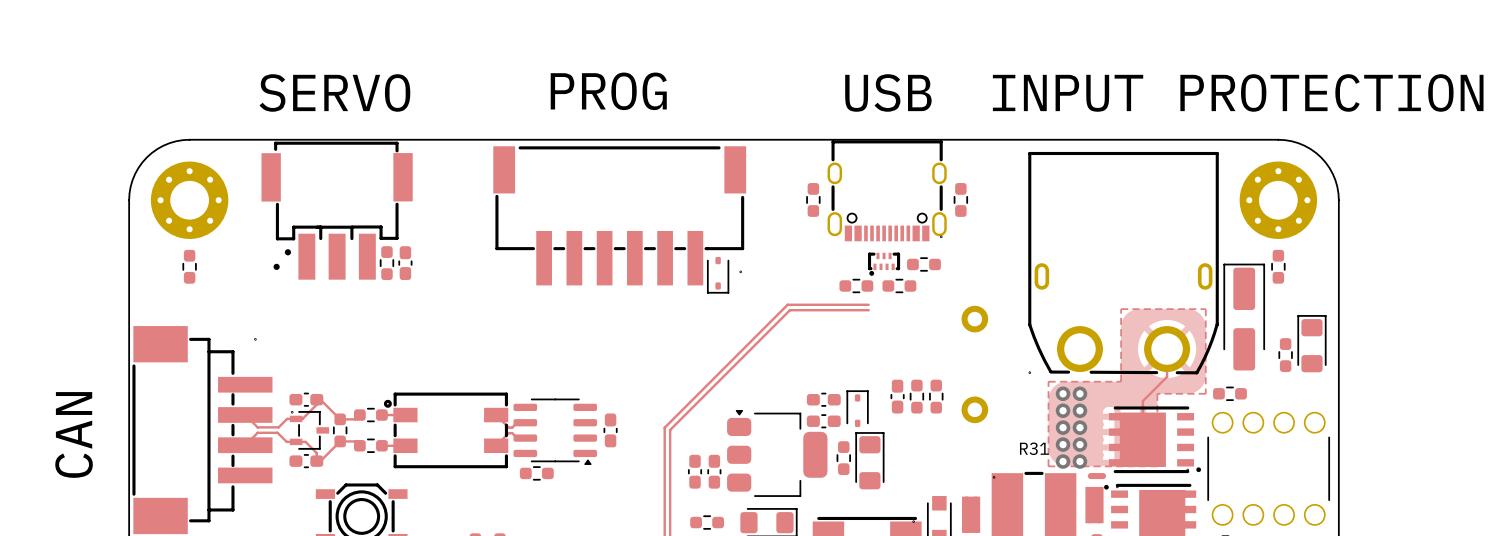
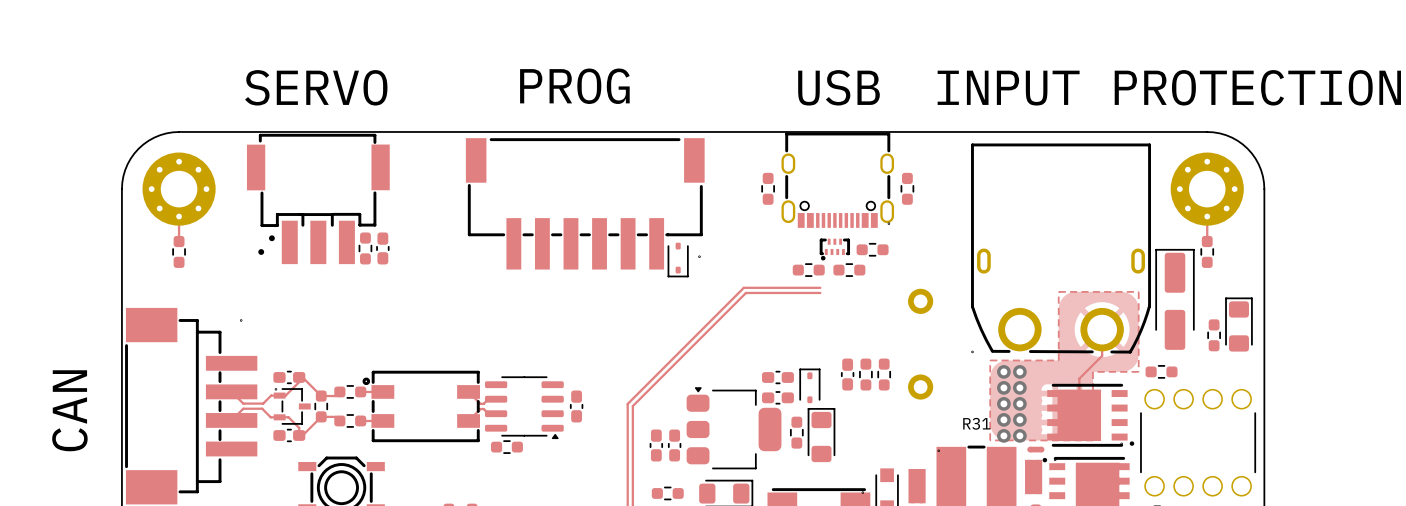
track: none -> (179, 216) (179, 241)
track: none -> (1207, 216) (1207, 241)

